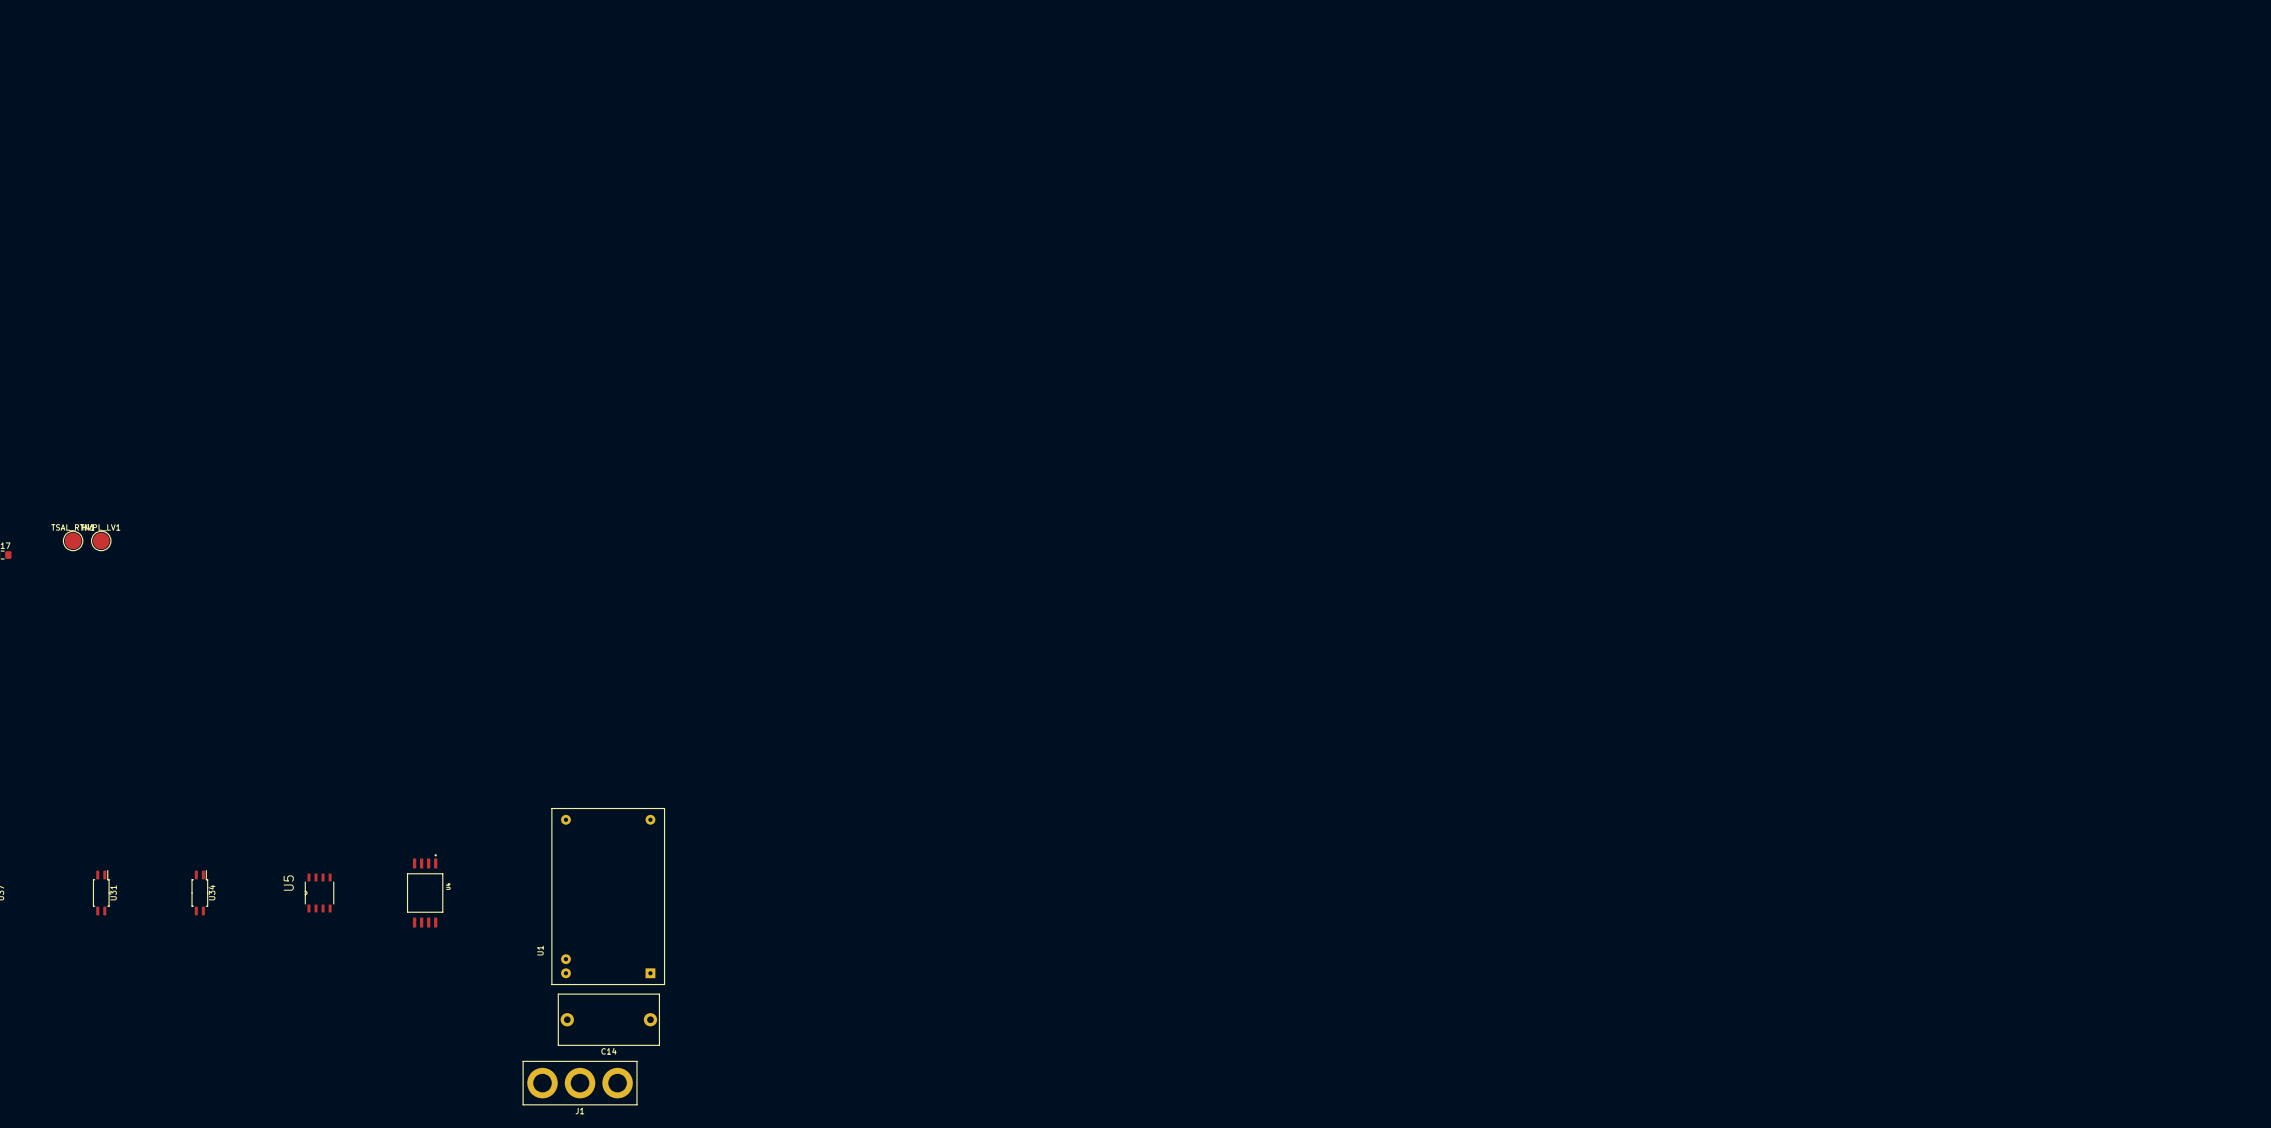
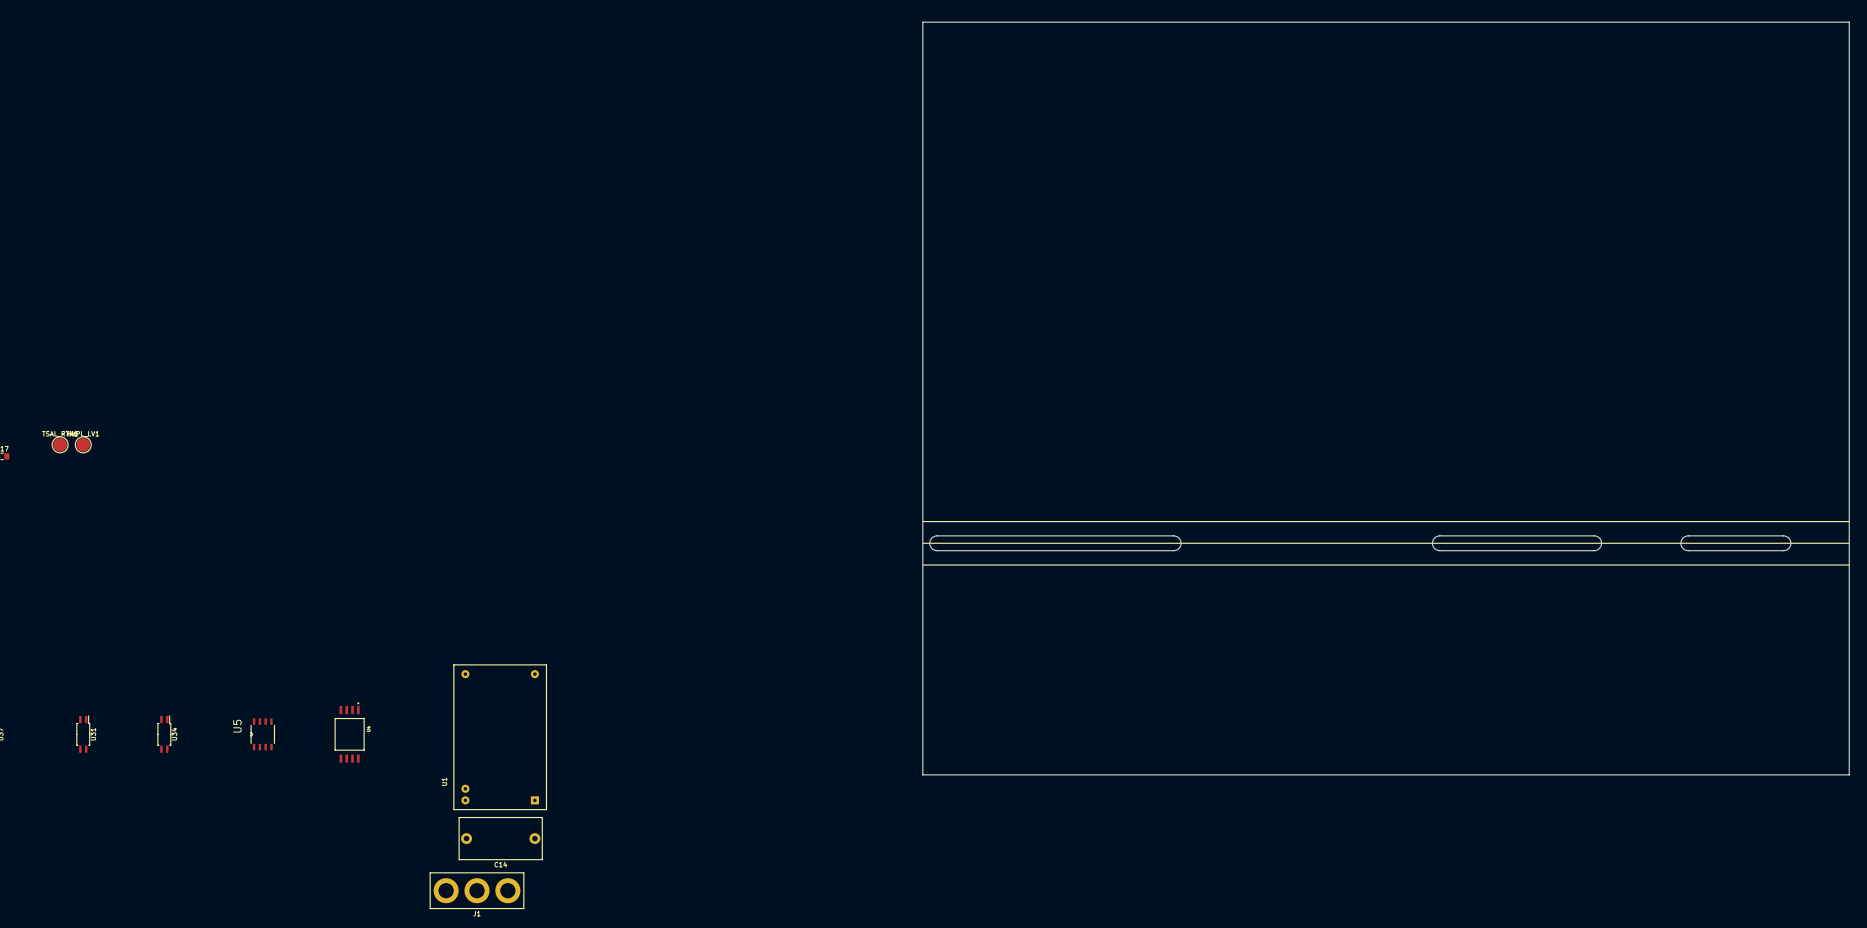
board edge: none -> (922, 22) (1849, 22) (1849, 774) (922, 774) (922, 22)
line: none -> (922, 521) (1849, 521)
board edge: none -> (937, 535) (1173, 535) (1178, 538) (1181, 543) (1178, 548) (1173, 550) (937, 550) (931, 548) (929, 543) (931, 538) (937, 535)
board edge: none -> (1439, 535) (1594, 535) (1599, 538) (1601, 543) (1599, 548) (1594, 550) (1439, 550) (1434, 548) (1432, 543) (1434, 538) (1439, 535)
board edge: none -> (1688, 535) (1784, 535) (1789, 538) (1790, 544) (1788, 548) (1783, 550) (1687, 550) (1682, 547) (1680, 542) (1683, 538) (1688, 535)
line: none -> (922, 543) (1849, 543)
line: none -> (922, 565) (1849, 565)

